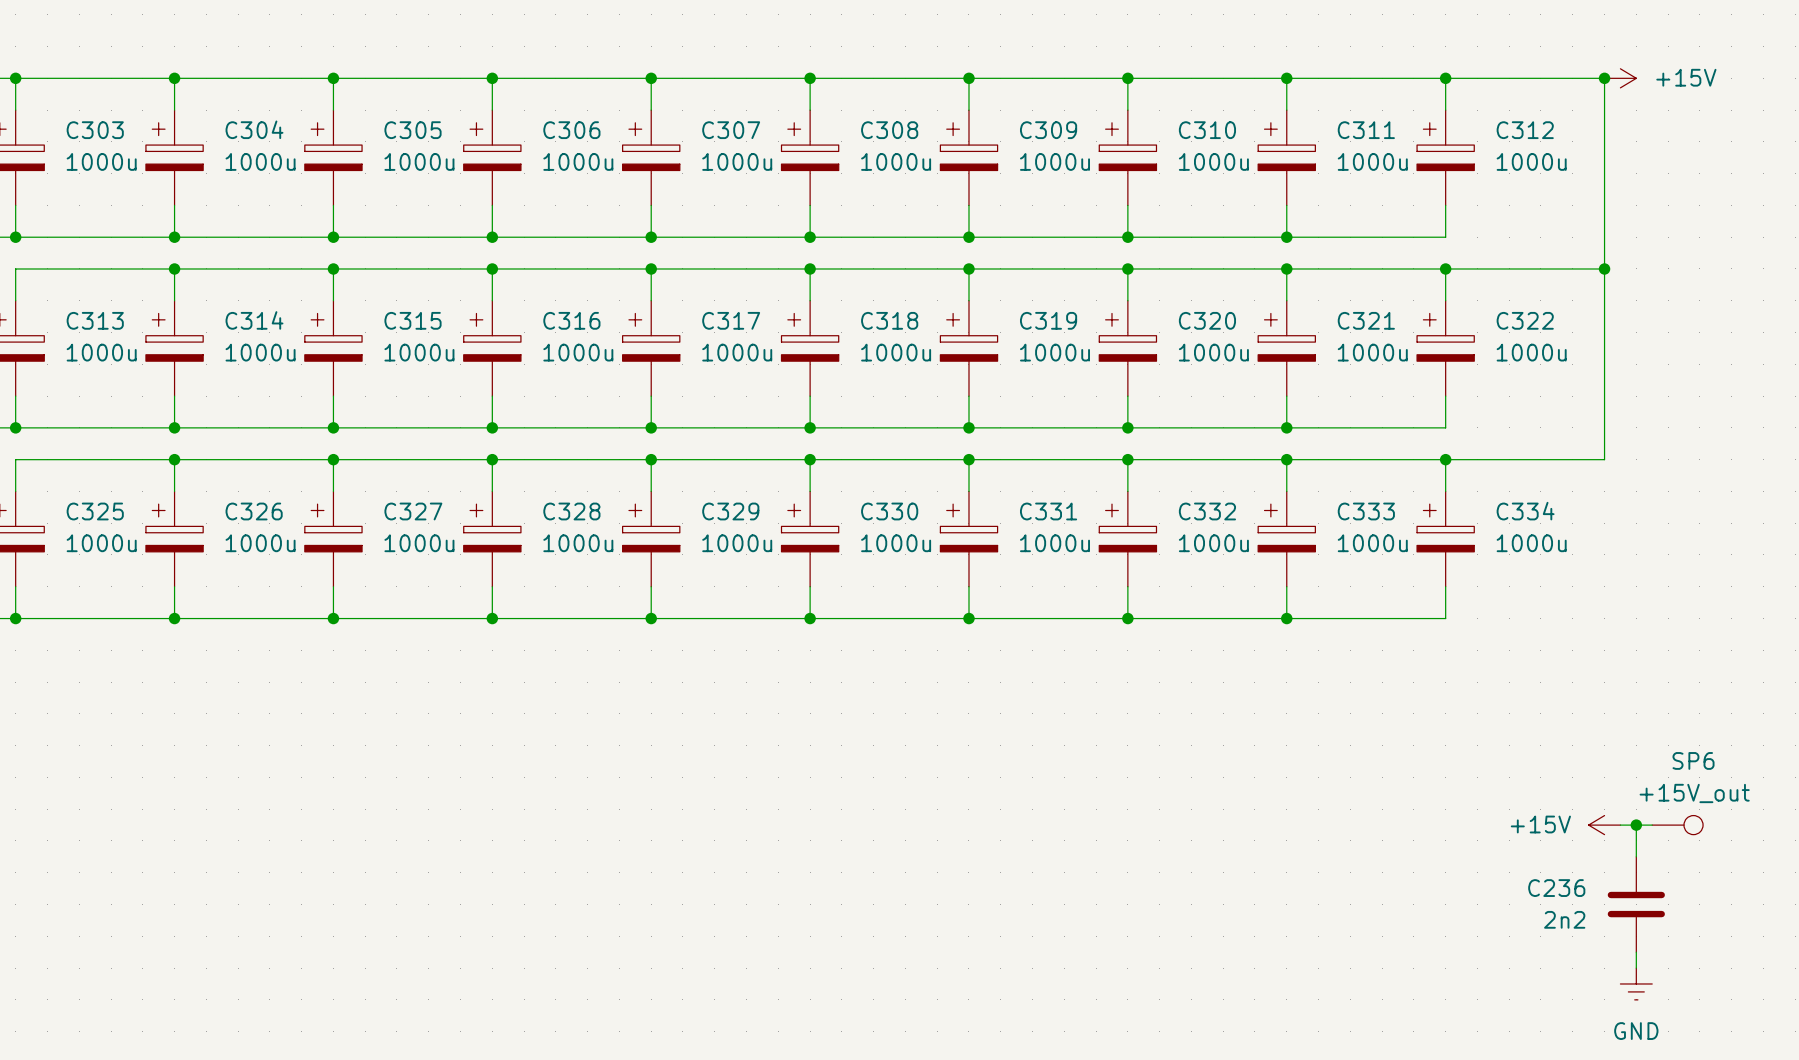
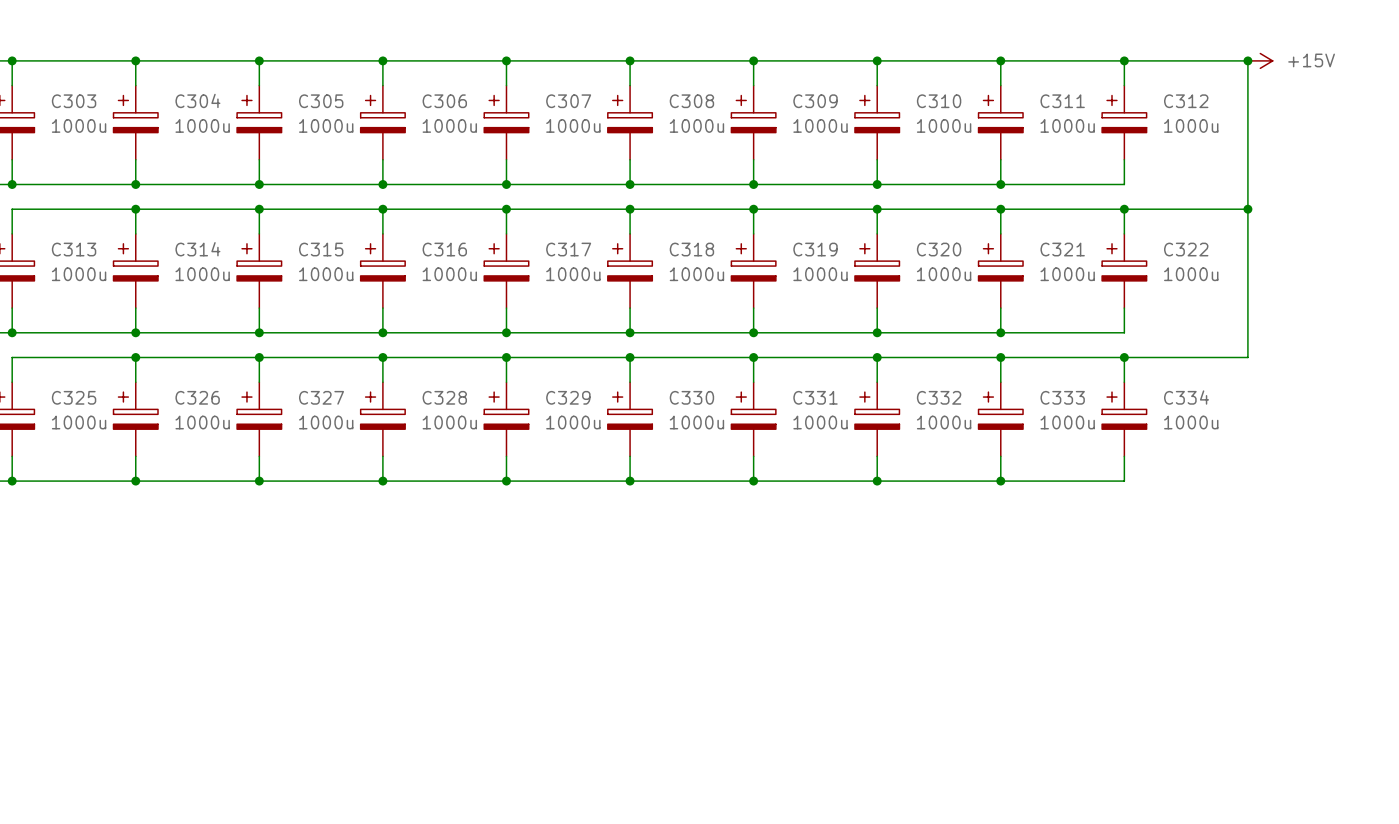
power symbol: +15V (1604, 825) -> none
wire: (1620, 825) (1652, 825) -> none
wire: (1636, 825) (1636, 856) -> none
junction: (1636, 825) -> none
SP6: +15V_out (1677, 825) -> none
C236: 2n2 (1636, 904) -> none
wire: (1636, 952) (1636, 968) -> none
power symbol: GND (1636, 983) -> none

